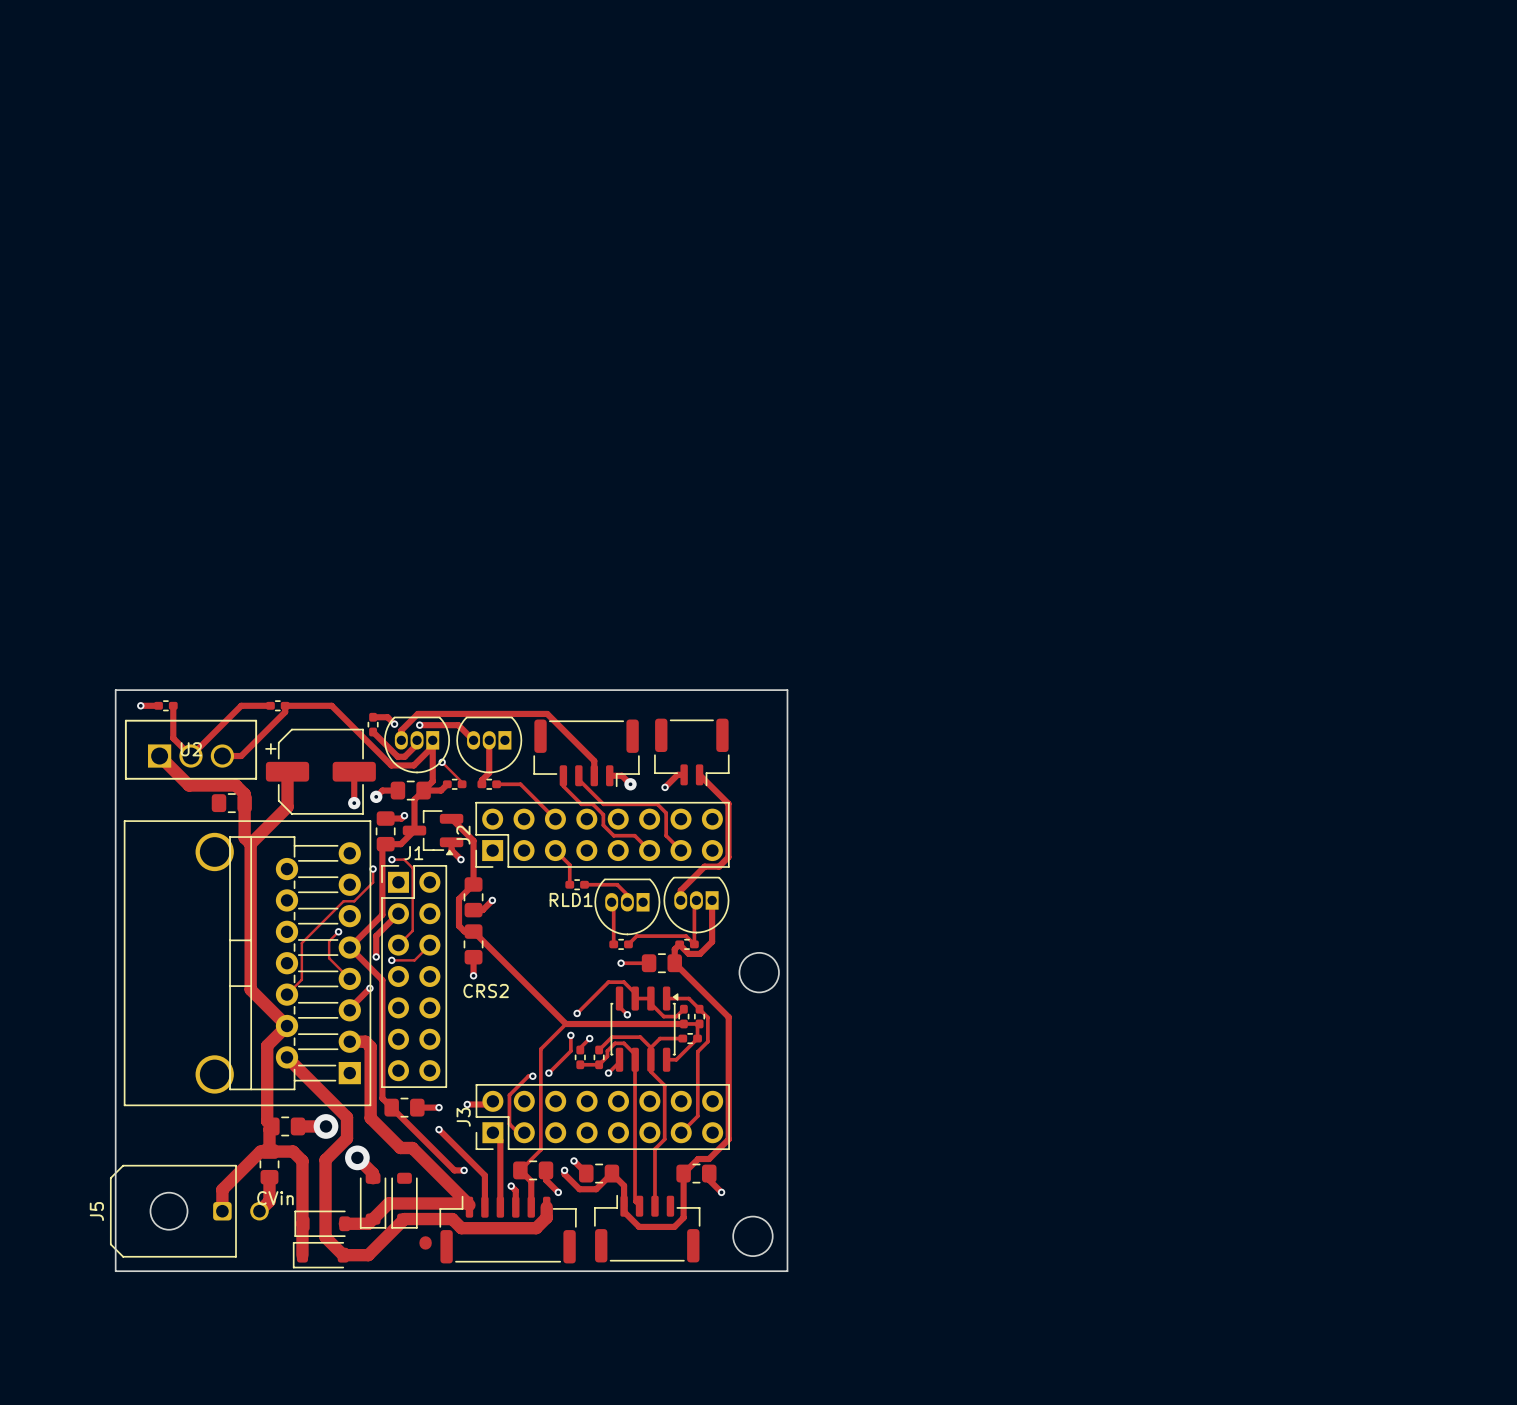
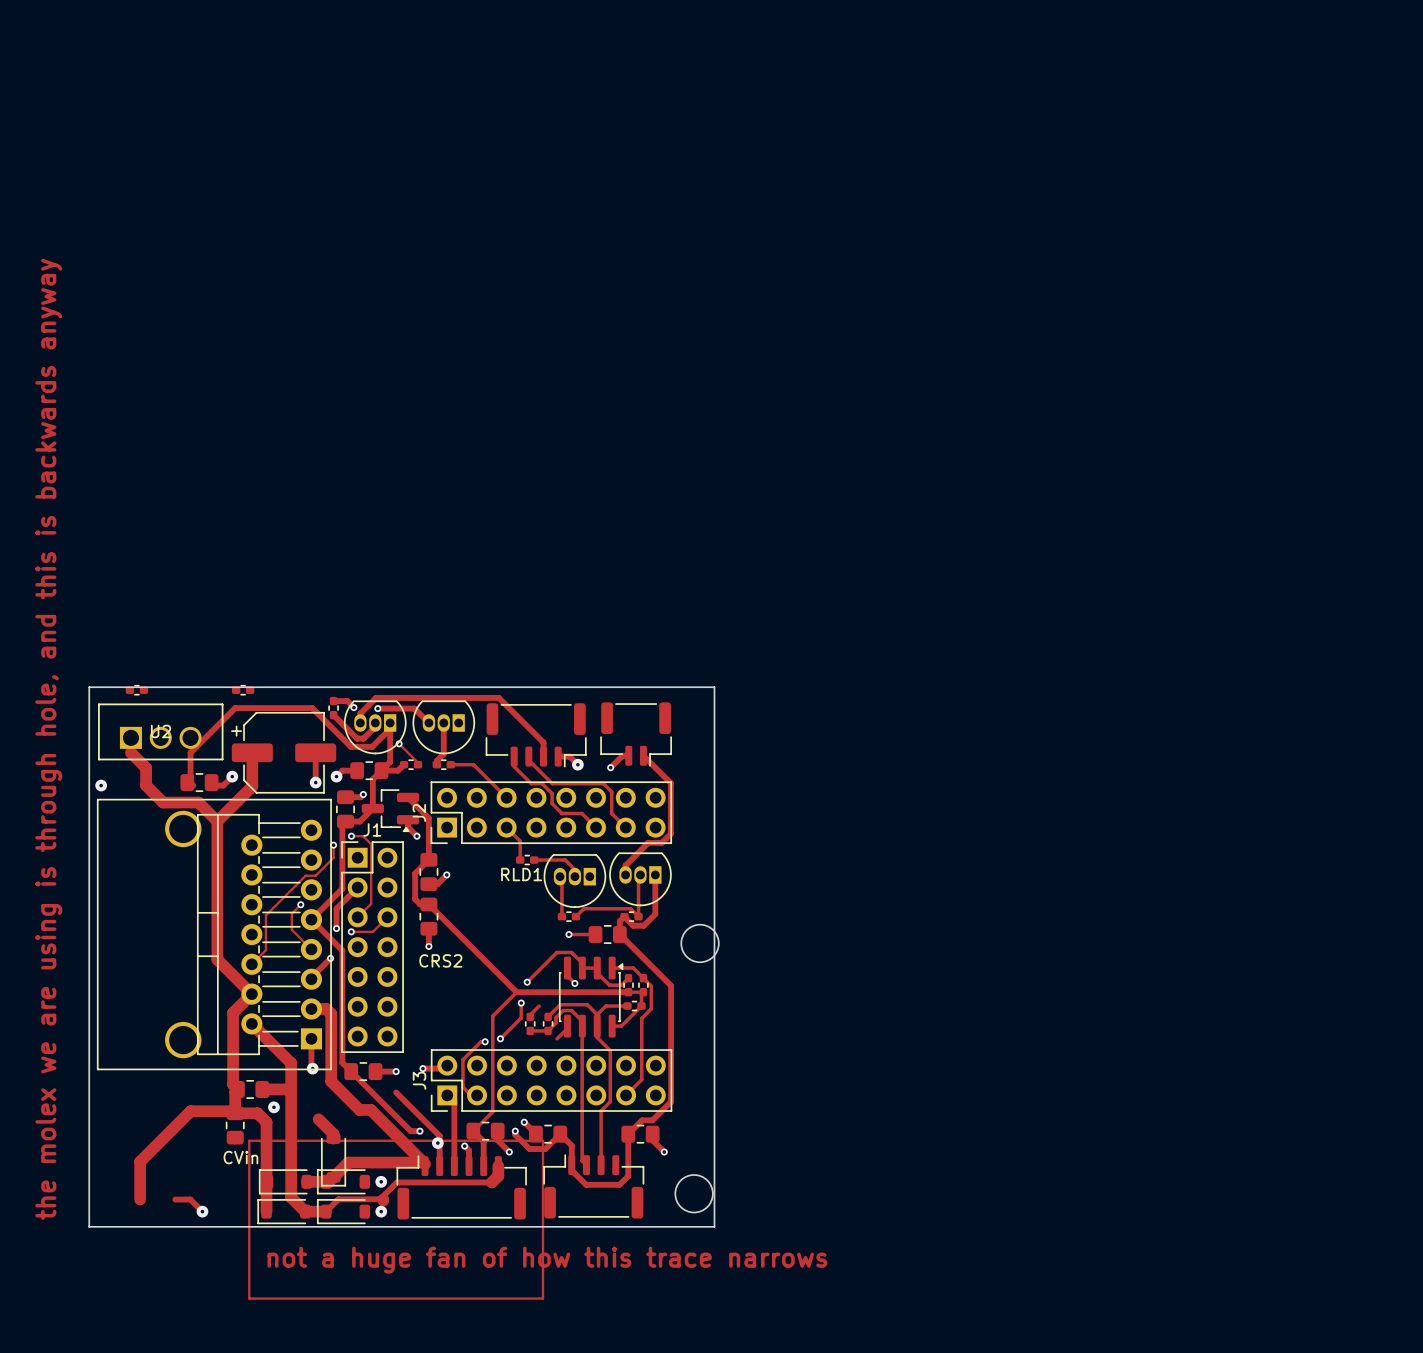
board edge: (115, 702) (115, 690) (787, 690) (787, 1271) (774, 1271) -> (89, 687) (714, 687) (714, 1226)
track: (140, 705) (158, 705) -> none
via: (140, 705) -> none
track: (173, 705) (173, 738) (191, 756) (241, 705) (270, 705) -> none
track: (350, 724) (331, 705) (285, 705) (285, 712) (241, 756) (222, 756) -> (312, 708) (235, 708) (190, 752) (190, 782) (193, 785)
track: (159, 756) (189, 785) (235, 785) (244, 794) (244, 837) -> (130, 752) (146, 767) (146, 785) (163, 802) (198, 802) (211, 815)
text: none -> the molex we are using is through hole, and this is backwards anyway (48, 739)
track: none -> (232, 776) (223, 785) (217, 785)
via: none -> (232, 776)
via: none -> (101, 785)
via: (589, 1038) -> none
track: none -> (311, 1038) (312, 1068)
via: (608, 1073) -> none
track: (328, 1098) (347, 1117) (347, 1138) (325, 1159) (325, 1237) (328, 1240) -> (291, 1063) (291, 1197)
via: none -> (312, 1068)
via: (326, 1126) -> none
via: (439, 1129) -> none
via: none -> (273, 1107)
track: none -> (233, 1111) (190, 1111) (140, 1161) (140, 1199)
track: (269, 1151) (260, 1151) (222, 1189) (222, 1211) -> none
via: (357, 1157) -> none
track: (269, 1177) (269, 1201) (259, 1211) -> none
track: none -> (249, 1140) (249, 1298) (543, 1298) (543, 1140) (249, 1140)
via: none -> (437, 1143)
part: (404, 1200) -> none
J5: (189, 1211) -> none
part: none -> (343, 1181)
via: none -> (381, 1181)
track: (539, 1224) (536, 1228) (461, 1228) (452, 1219) (404, 1219) (368, 1255) (365, 1255) -> (491, 1182) (396, 1182) (380, 1199) (338, 1199) (326, 1211)
track: none -> (175, 1199) (190, 1199) (202, 1211)
via: none -> (202, 1211)
part: none -> (343, 1211)
via: none -> (381, 1211)
text: none -> not a huge fan of how this trace narrows (547, 1260)

